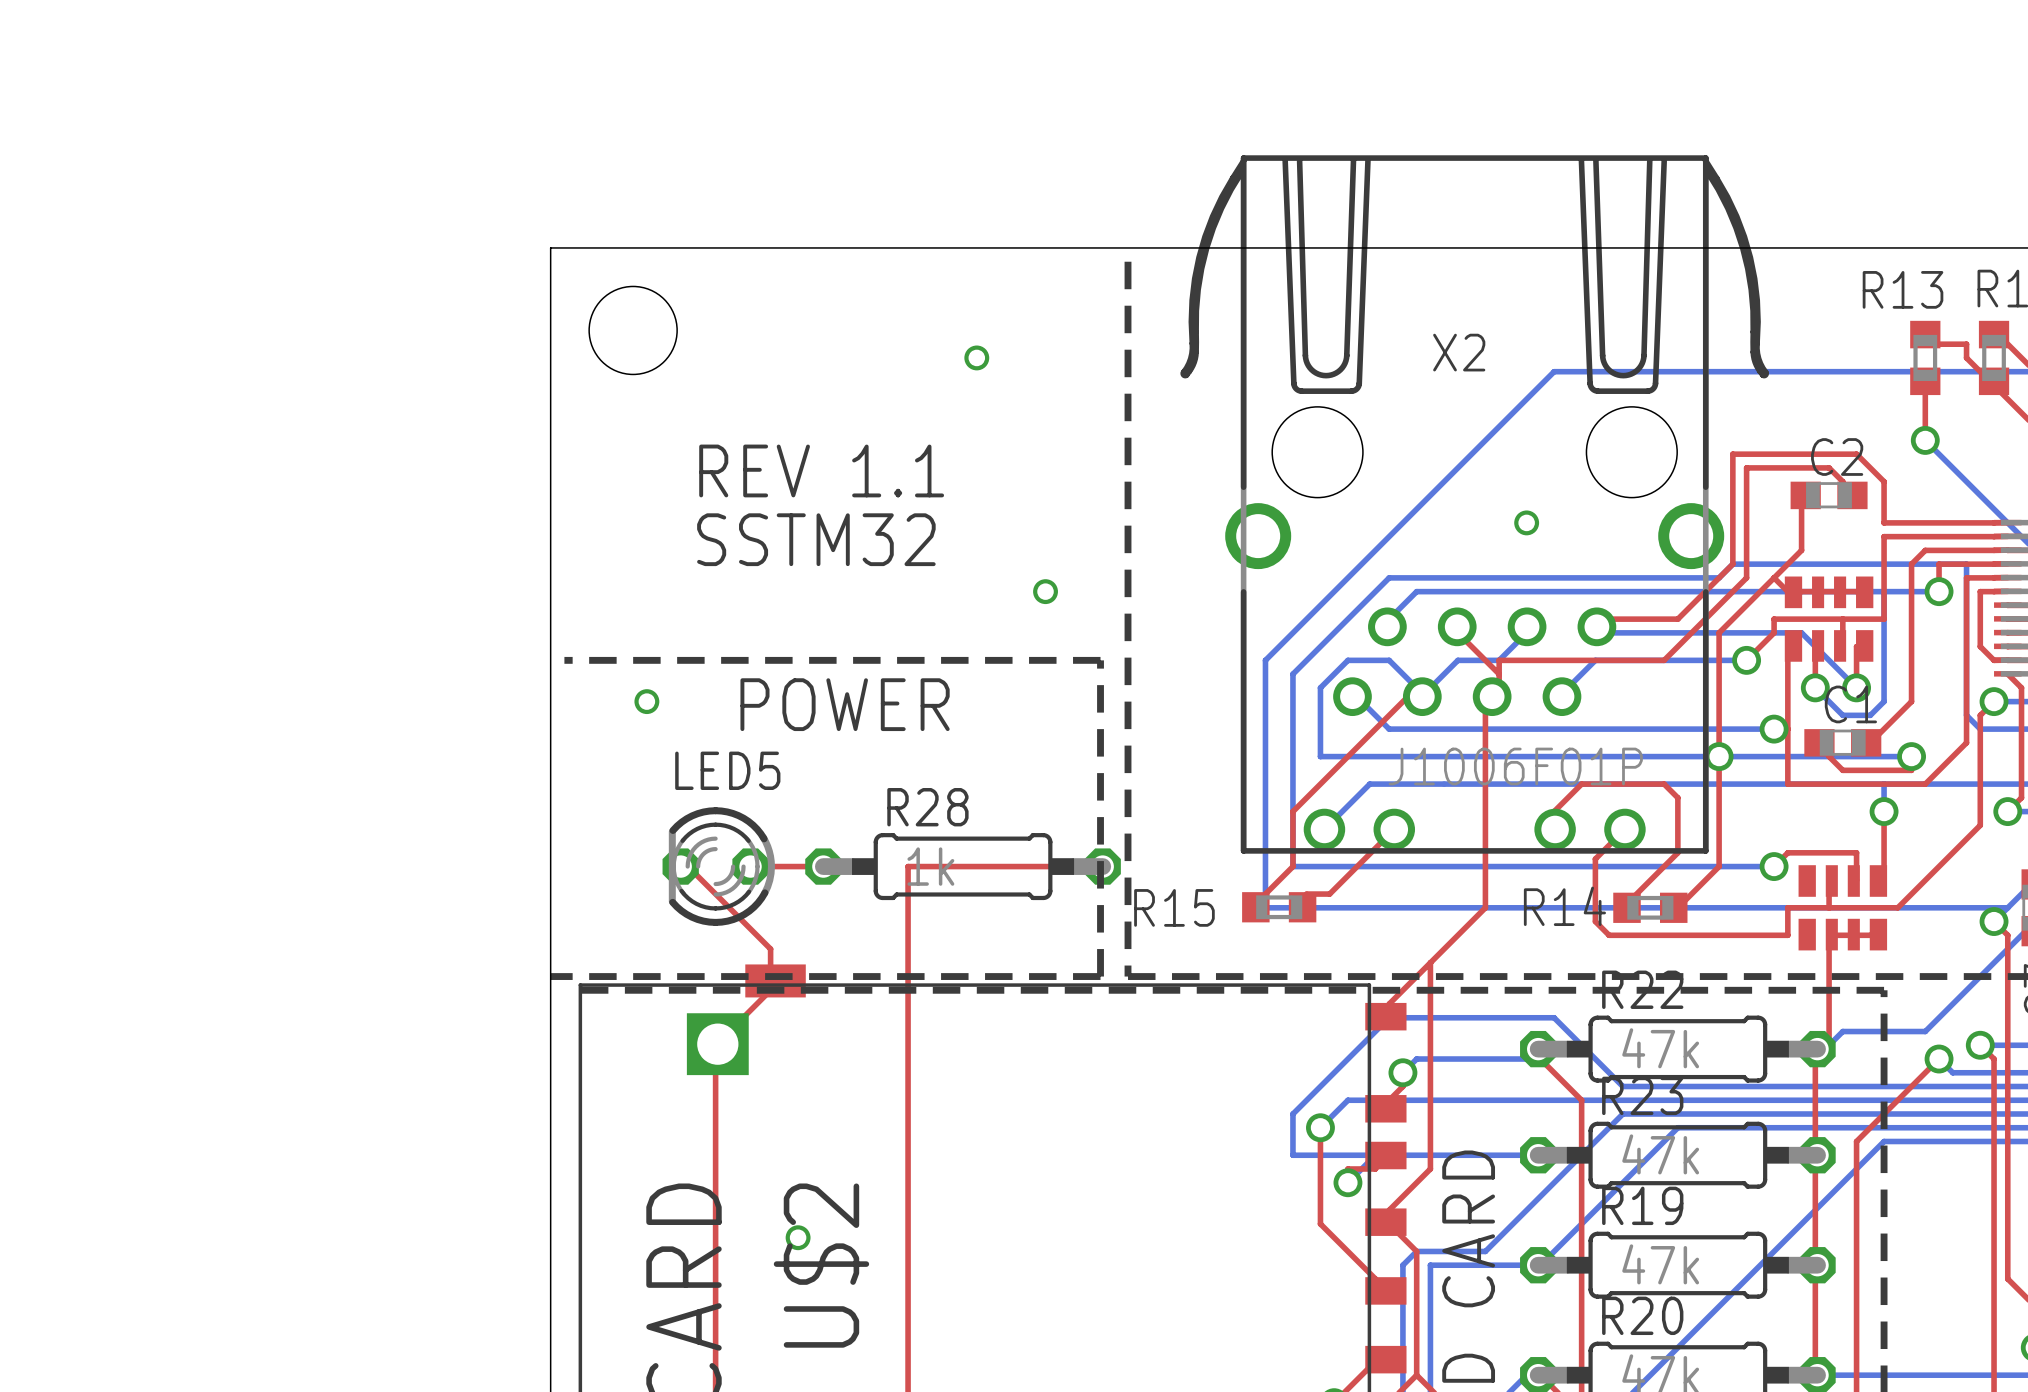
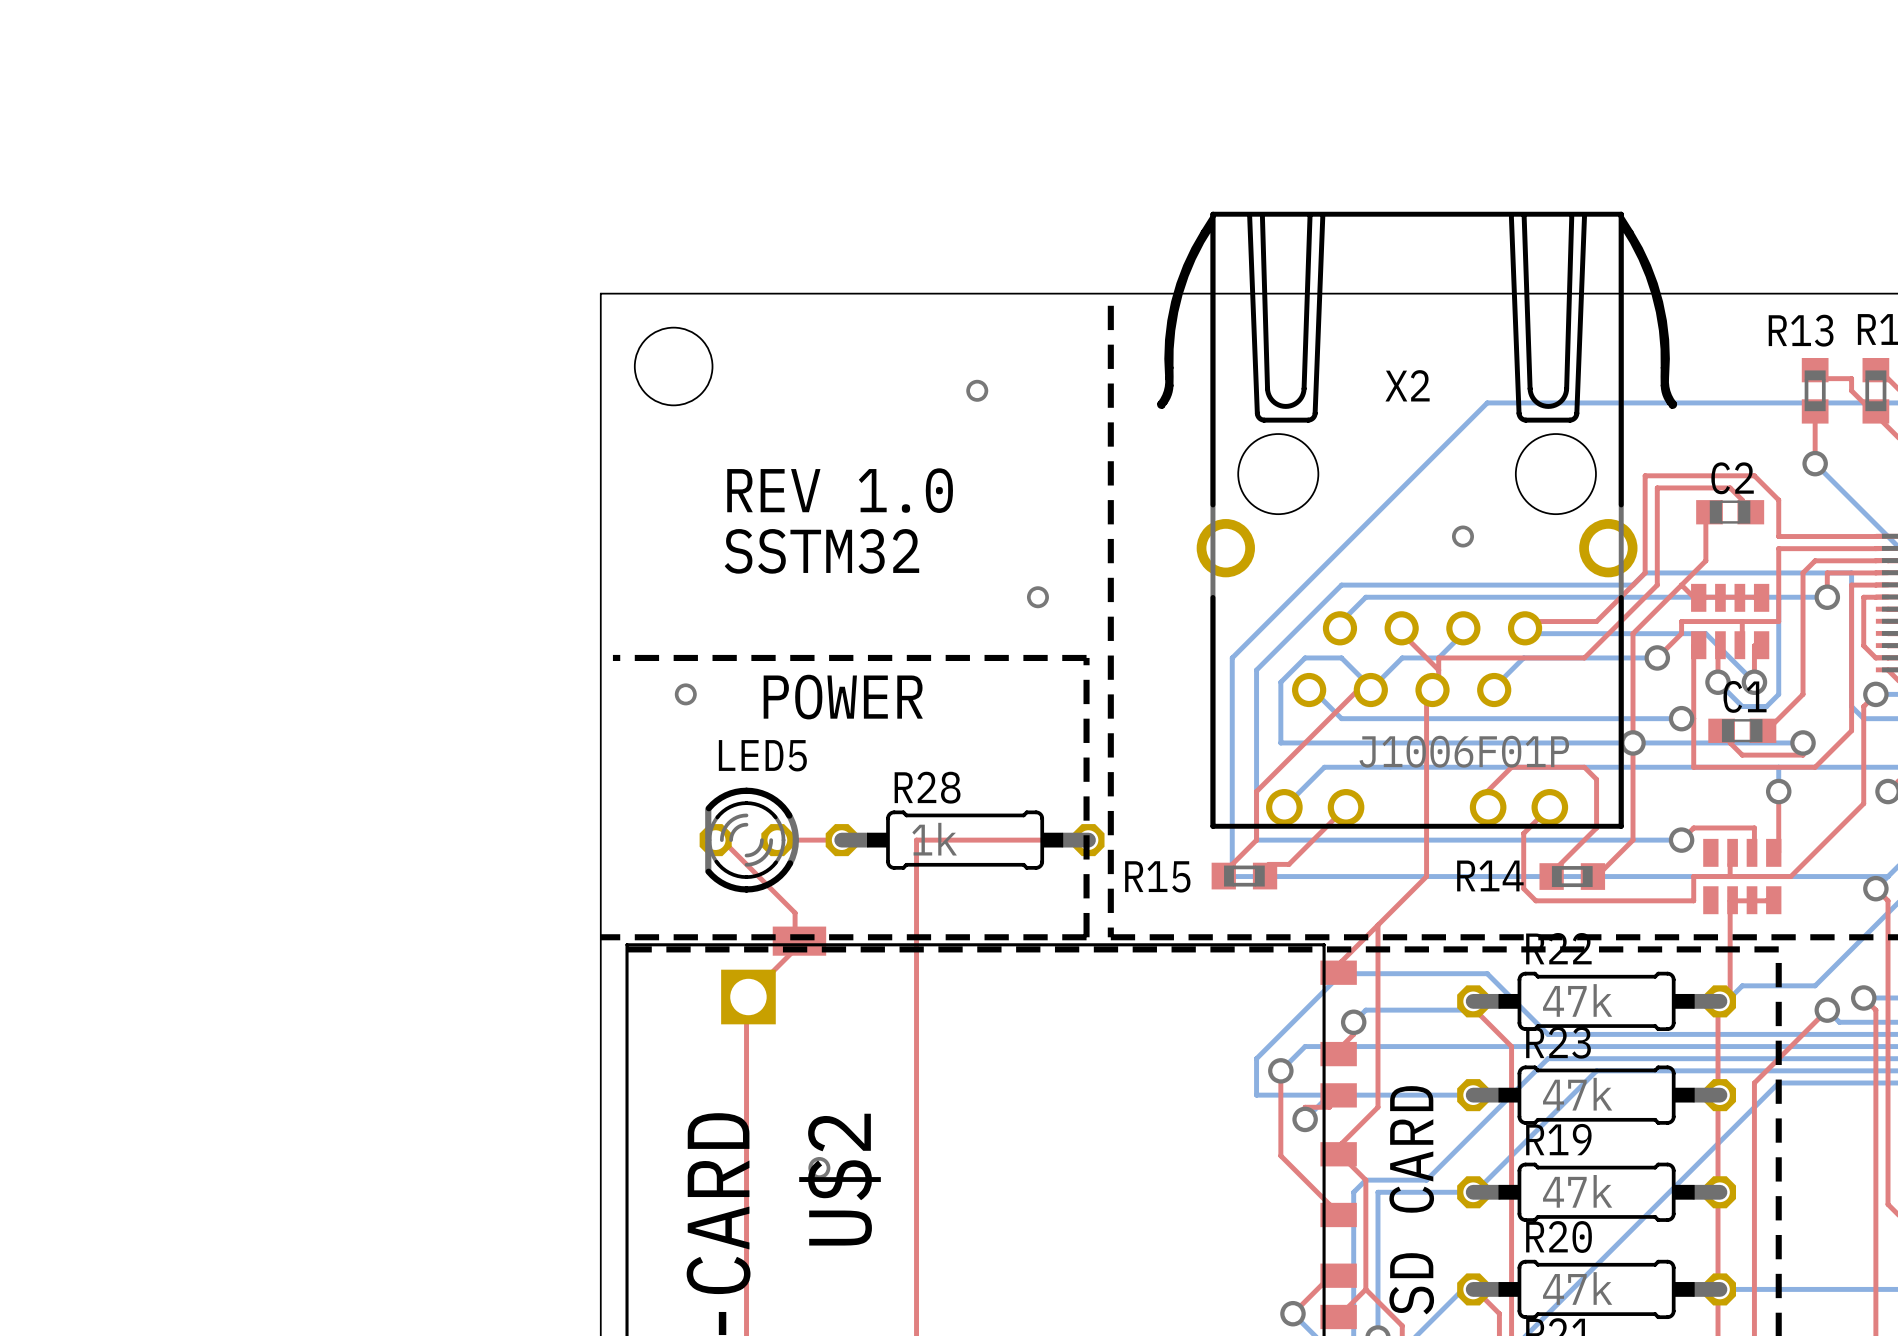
text: REV 1.1 (821, 470) -> REV 1.0 (840, 490)

